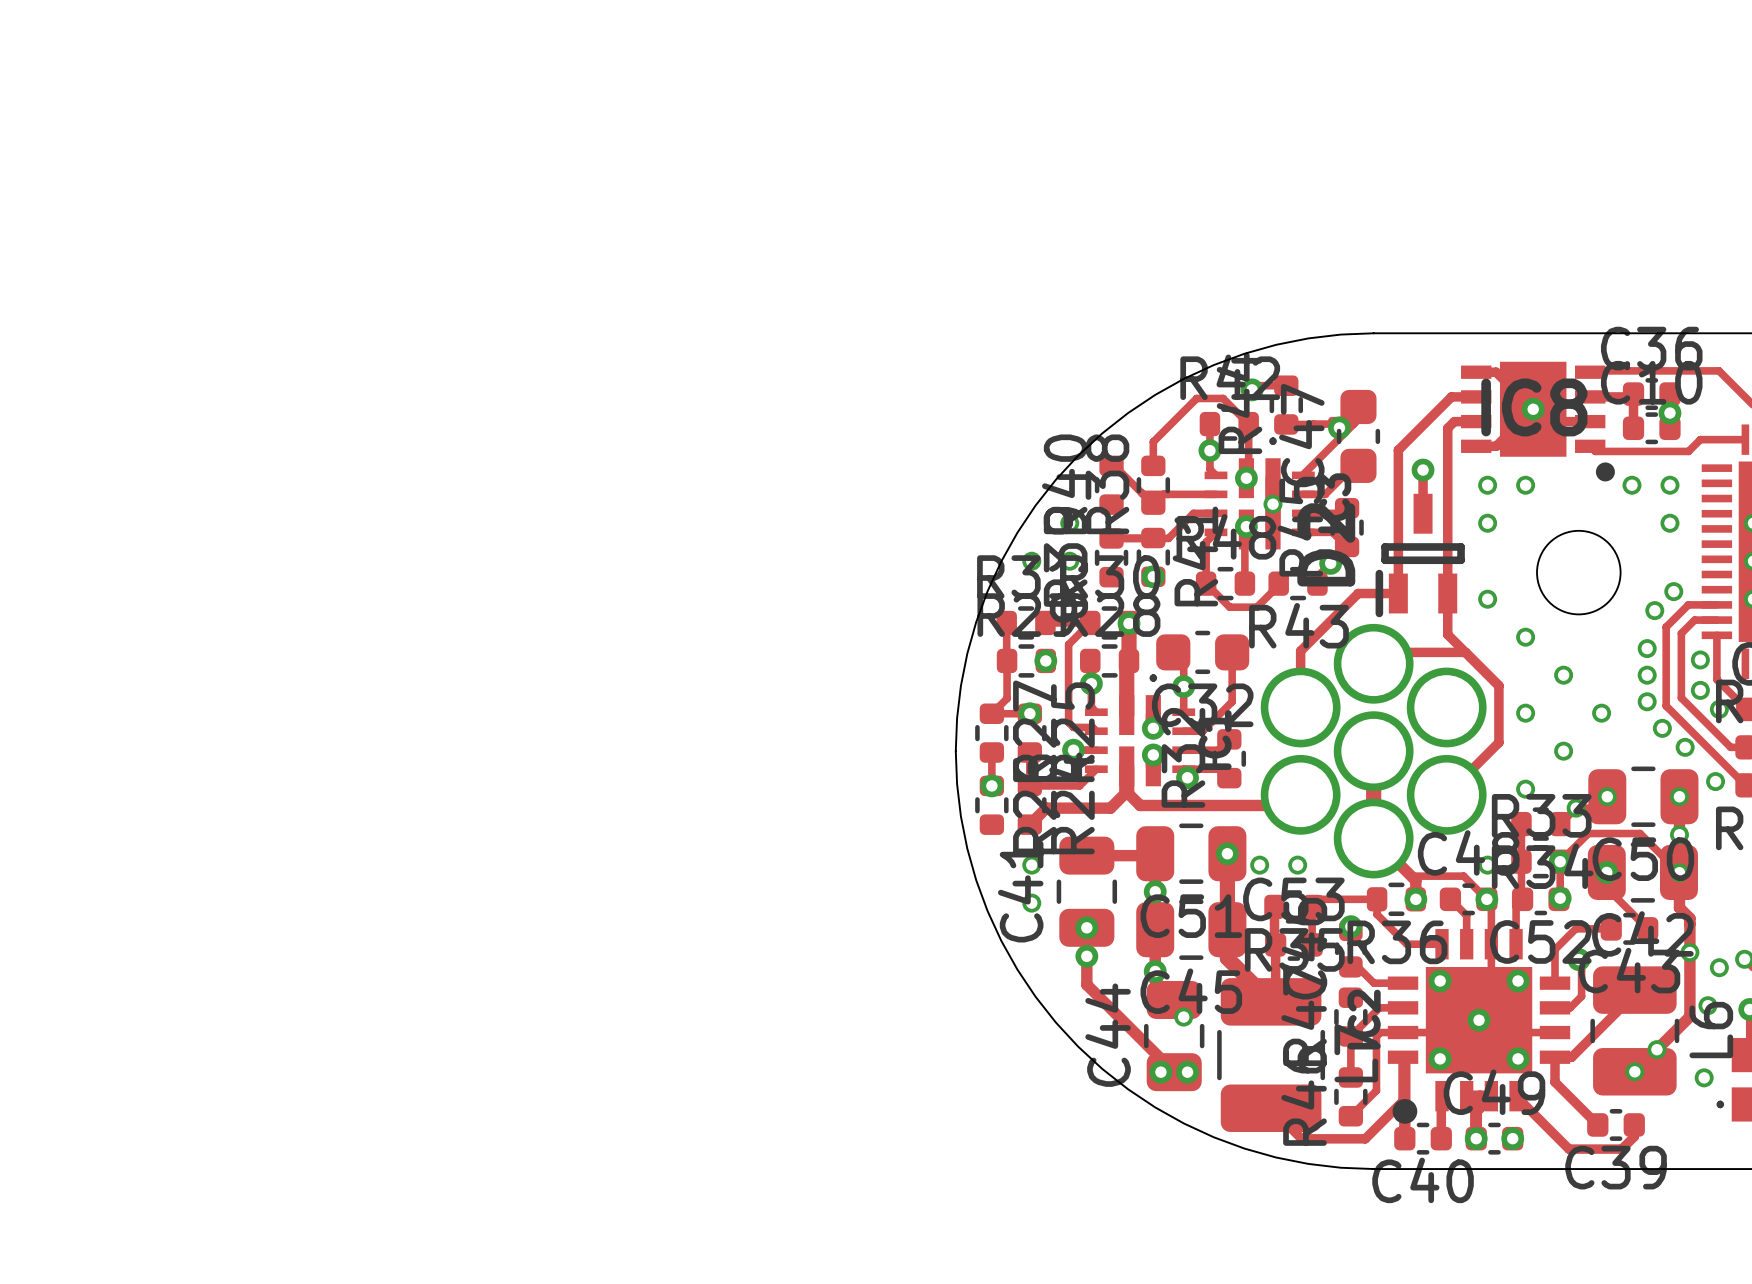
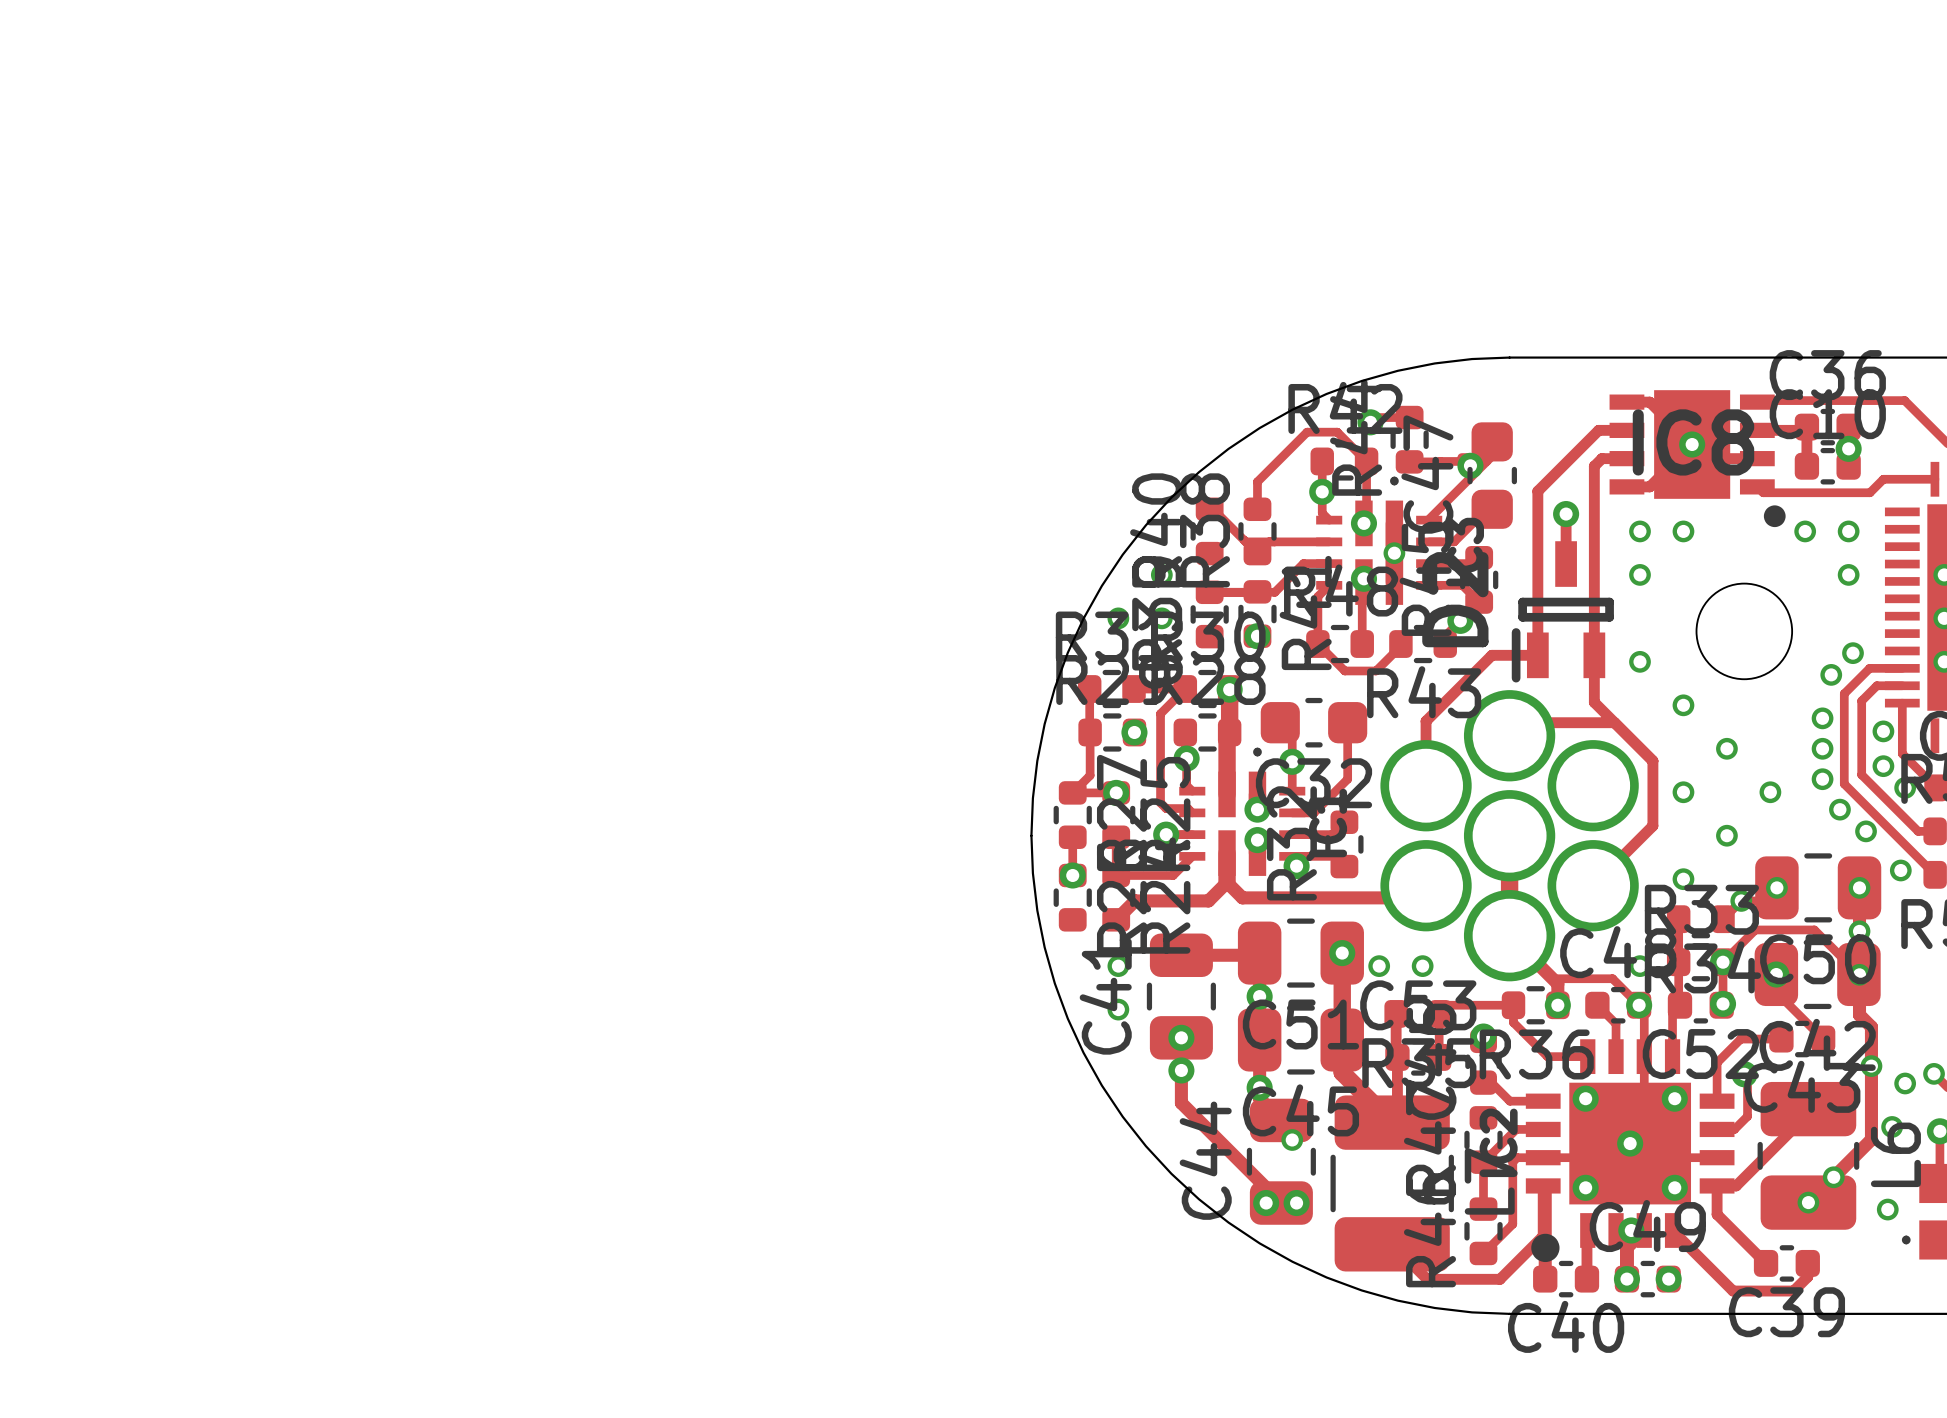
via: none -> (1631, 1230)

